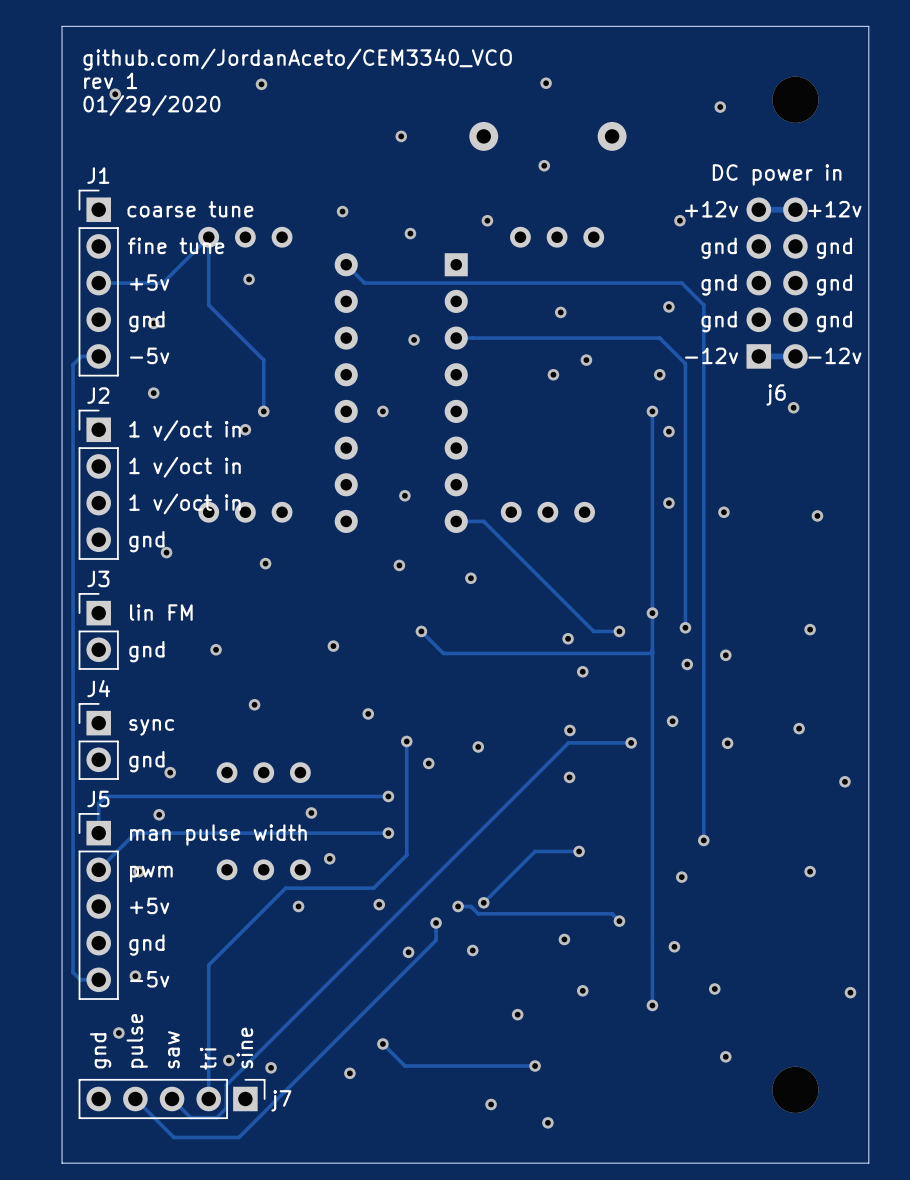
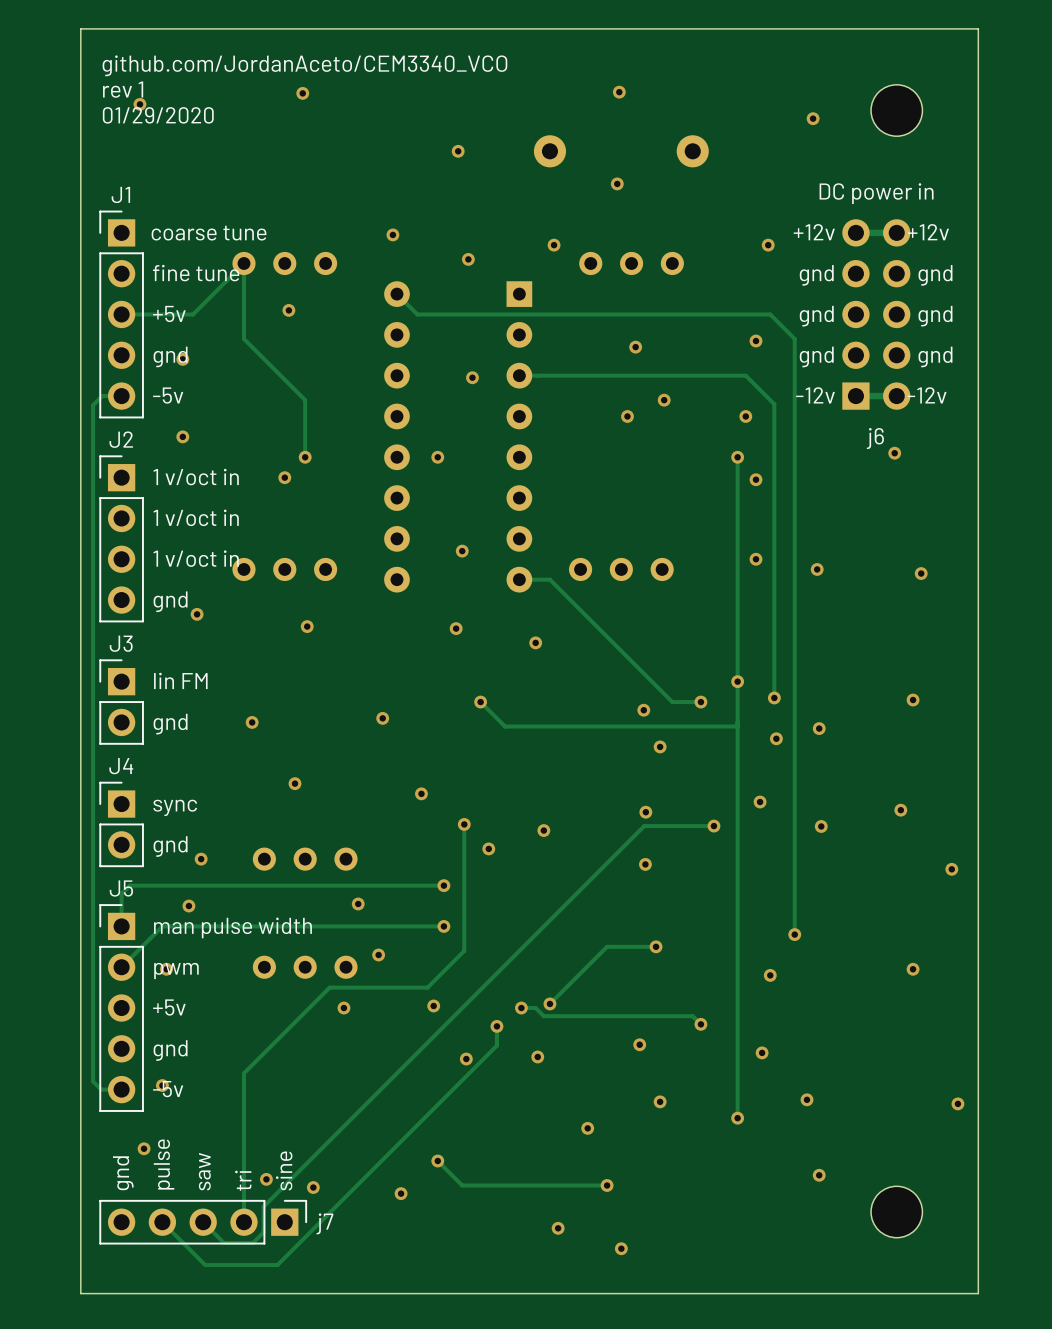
part footprint: [772, 76, 819, 123] -> [871, 84, 923, 137]
part footprint: [772, 1066, 819, 1113] -> [871, 1186, 923, 1238]

